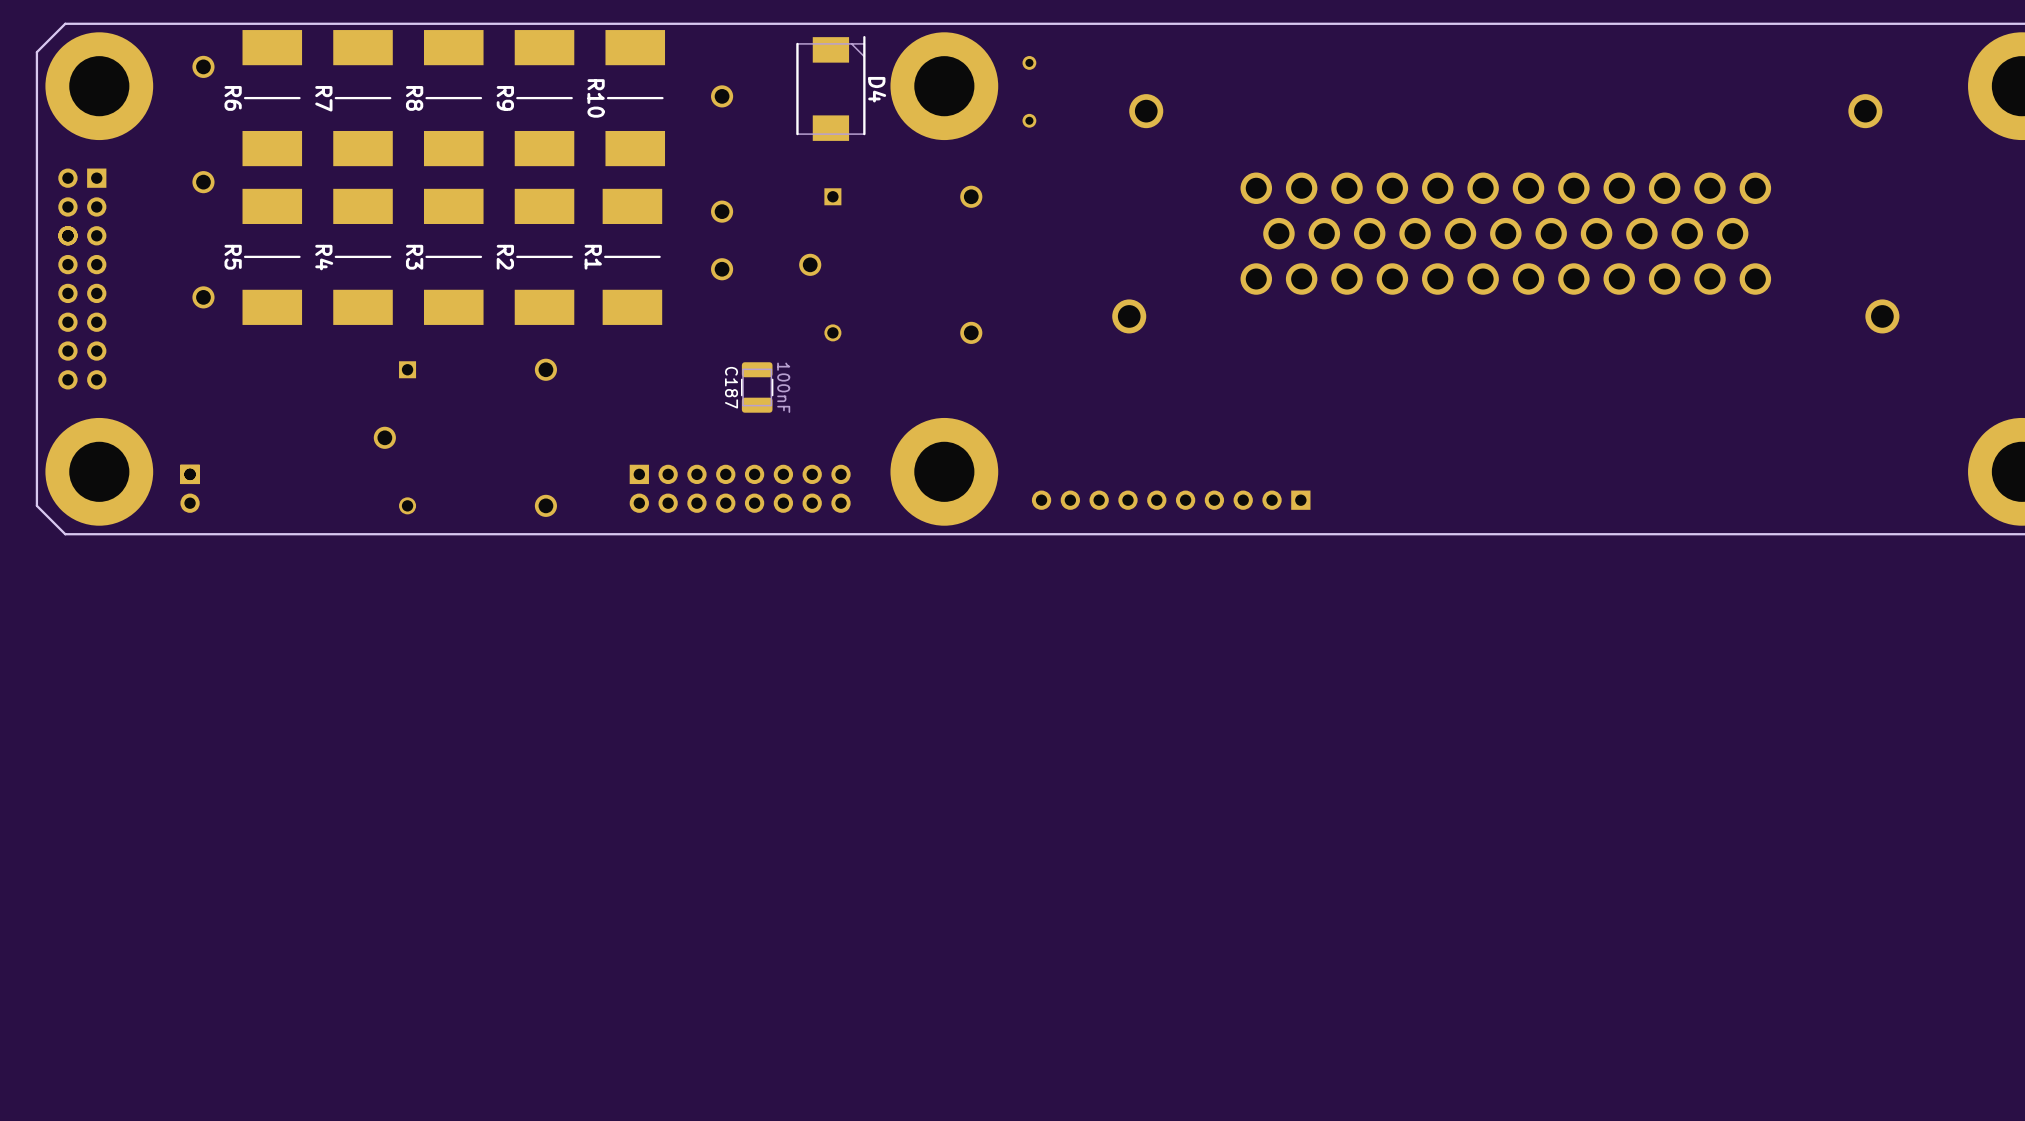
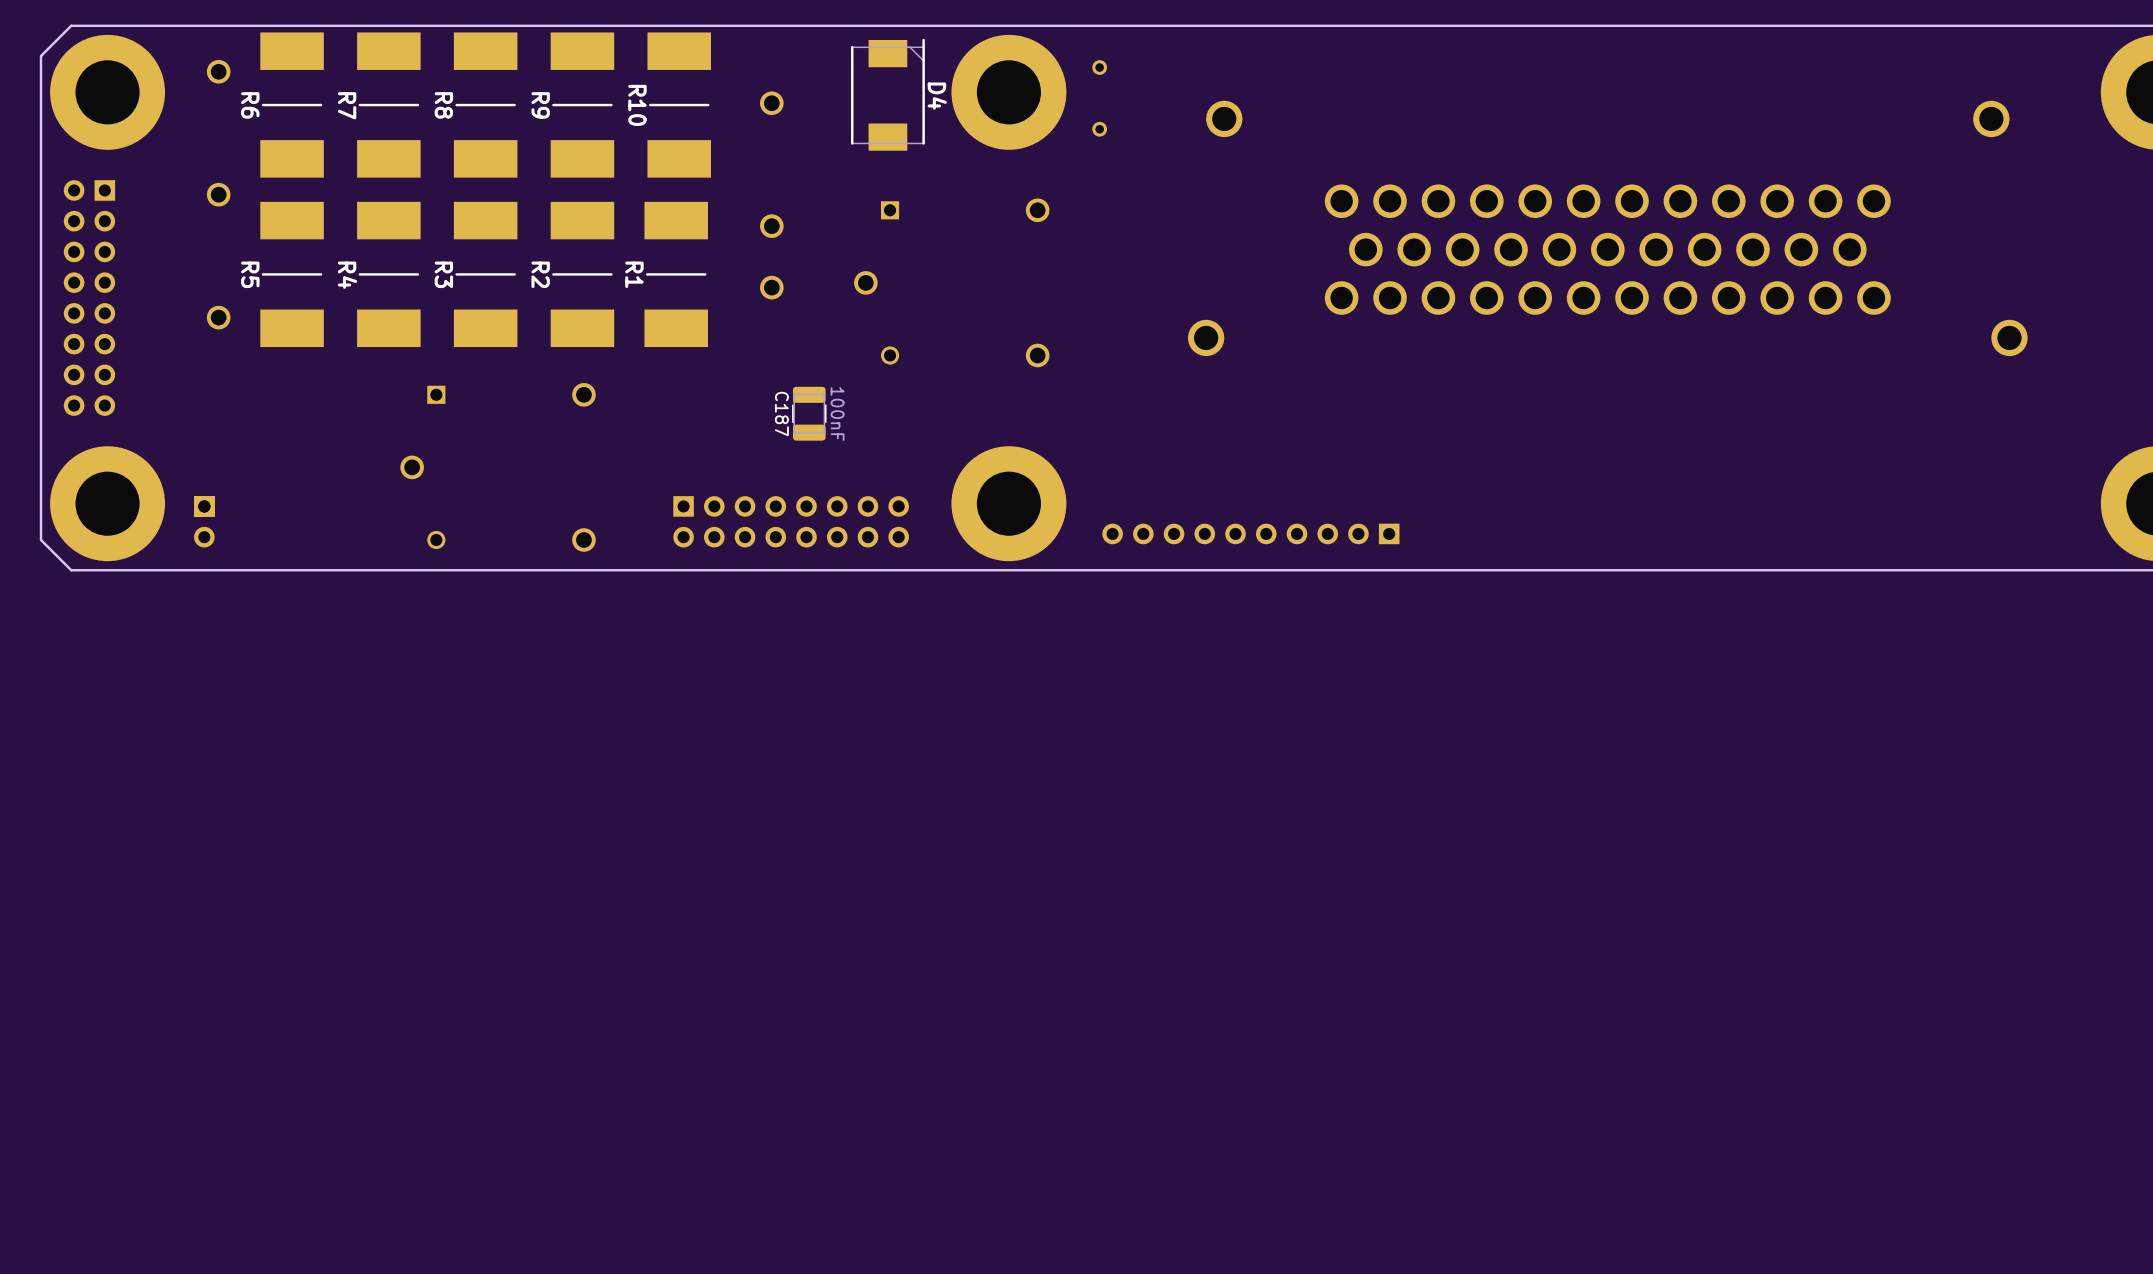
part: (67, 235) -> none

